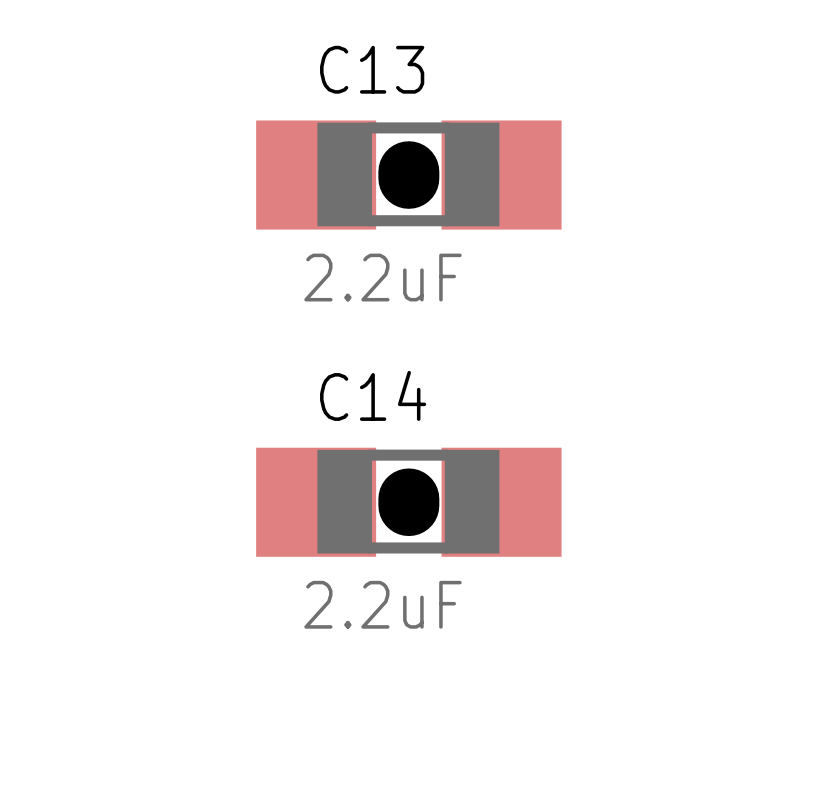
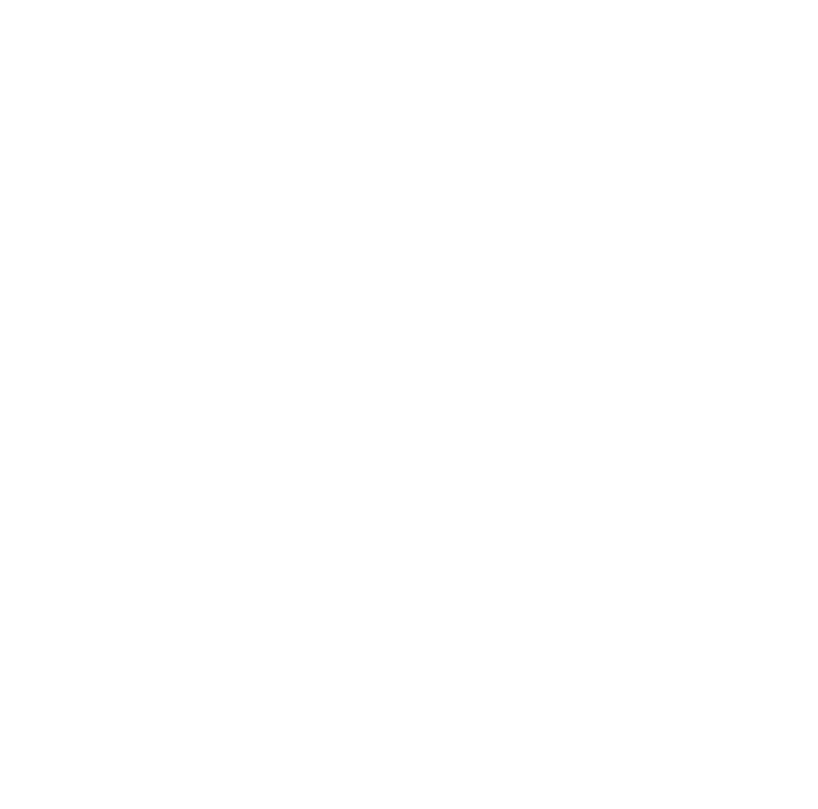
C13: 2.2uF (408, 175) -> none
C14: 2.2uF (408, 502) -> none

